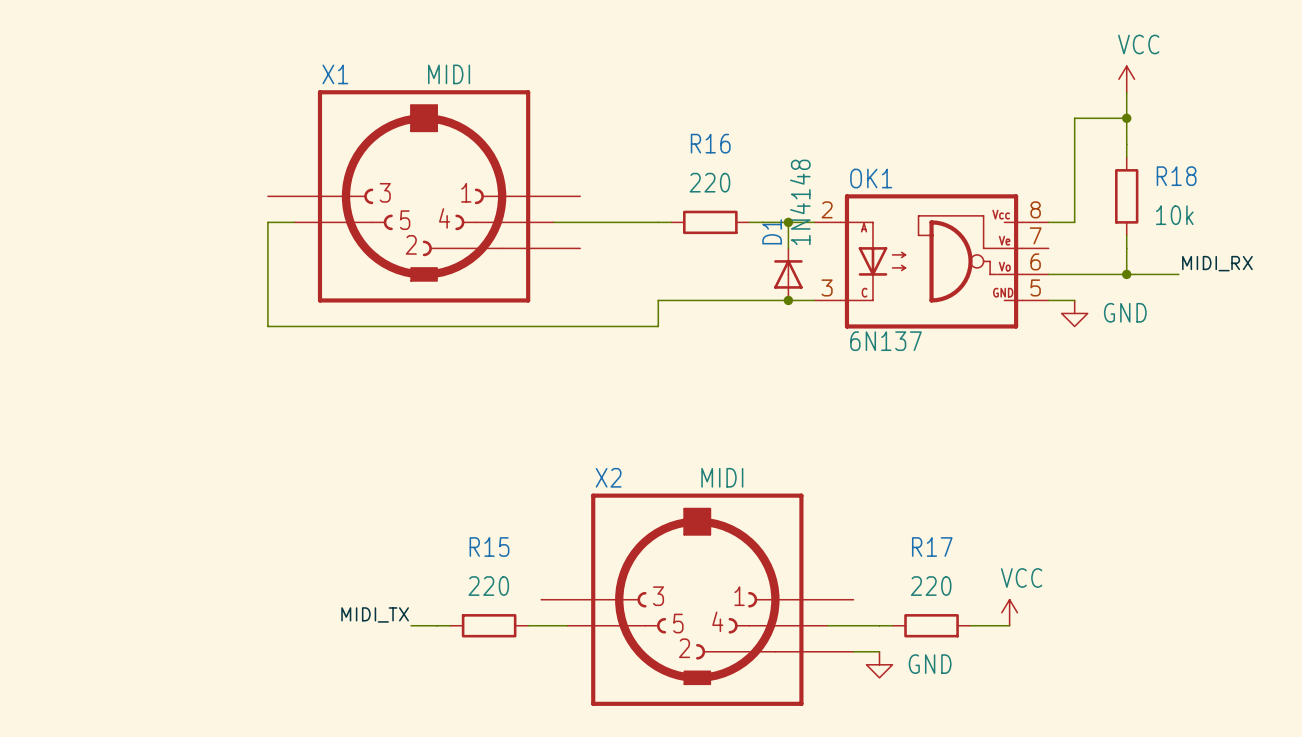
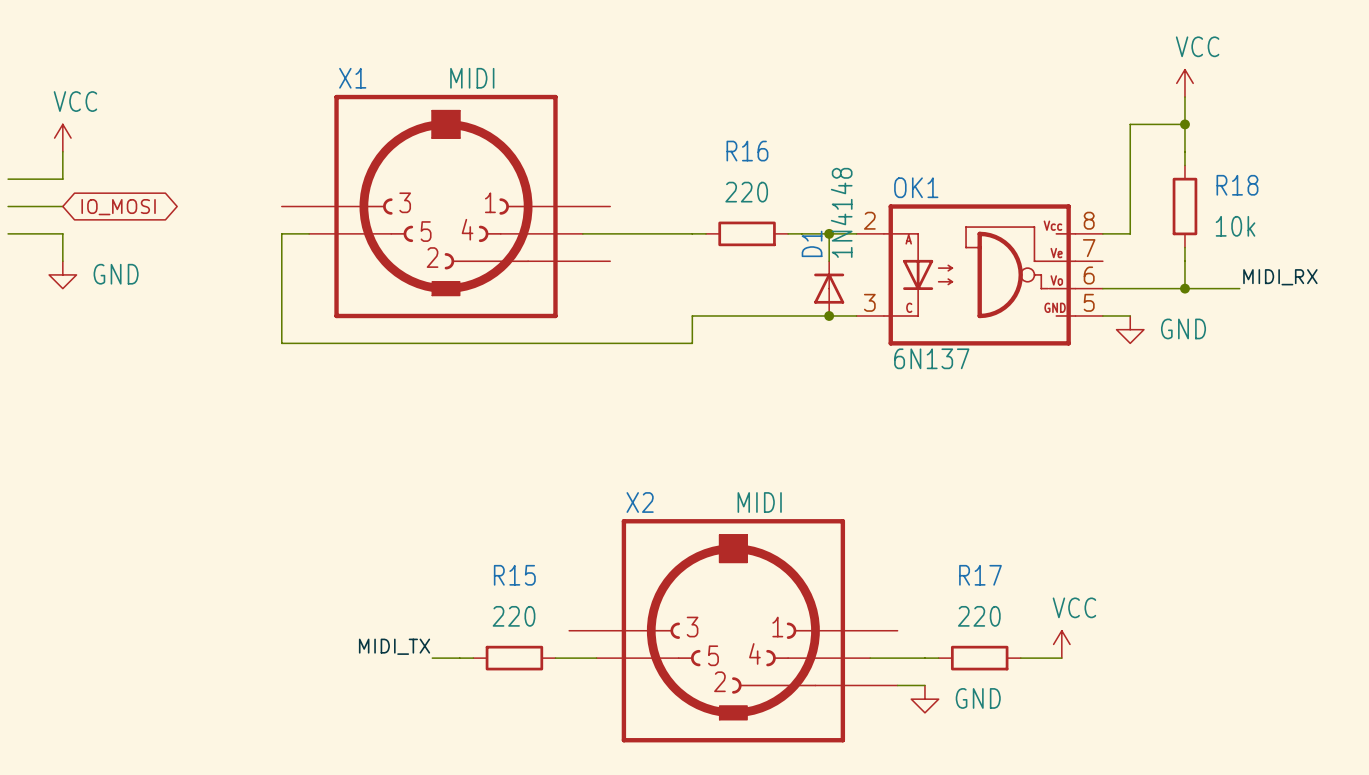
power symbol: none -> VCC (62, 138)
wire: none -> (62, 151) (62, 179) (8, 179)
wire: none -> (8, 206) (62, 206)
global label: none -> IO_MOSI (118, 207)
wire: none -> (8, 233) (62, 233) (62, 261)
power symbol: none -> GND (62, 274)

